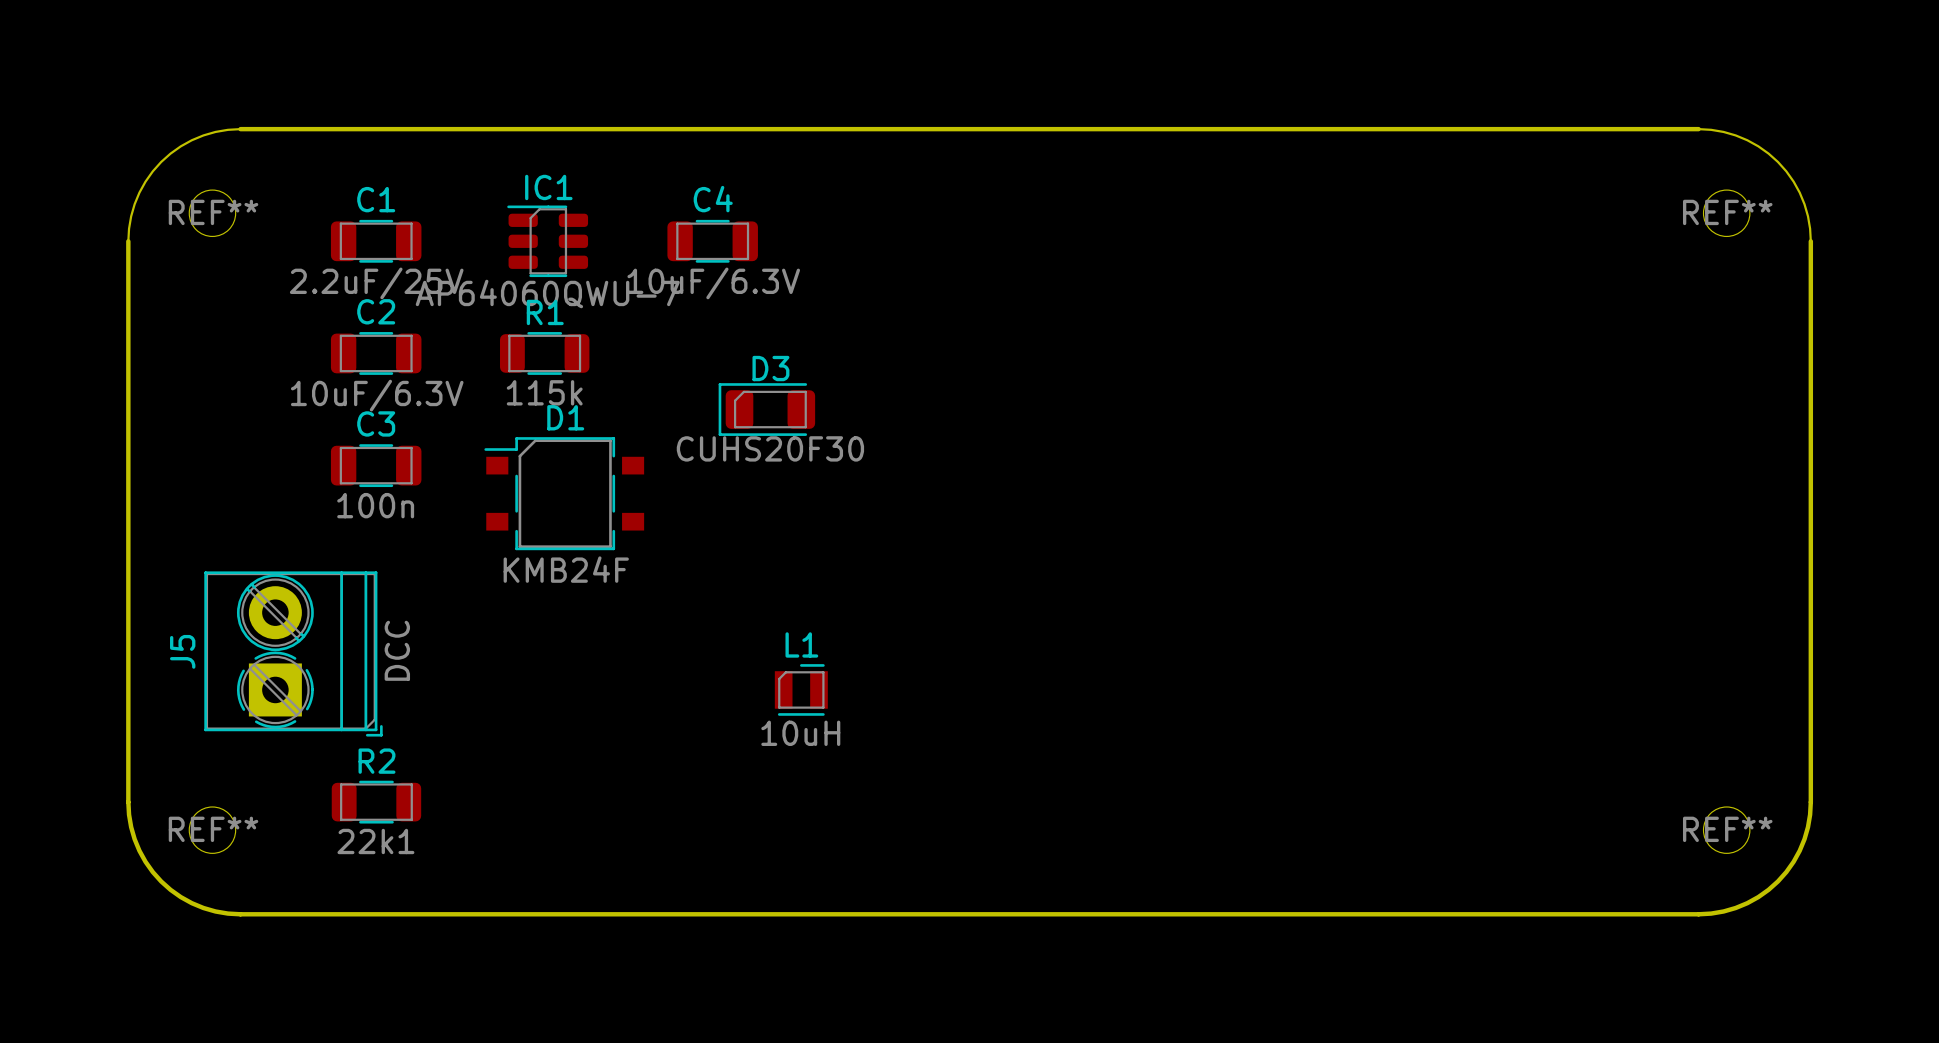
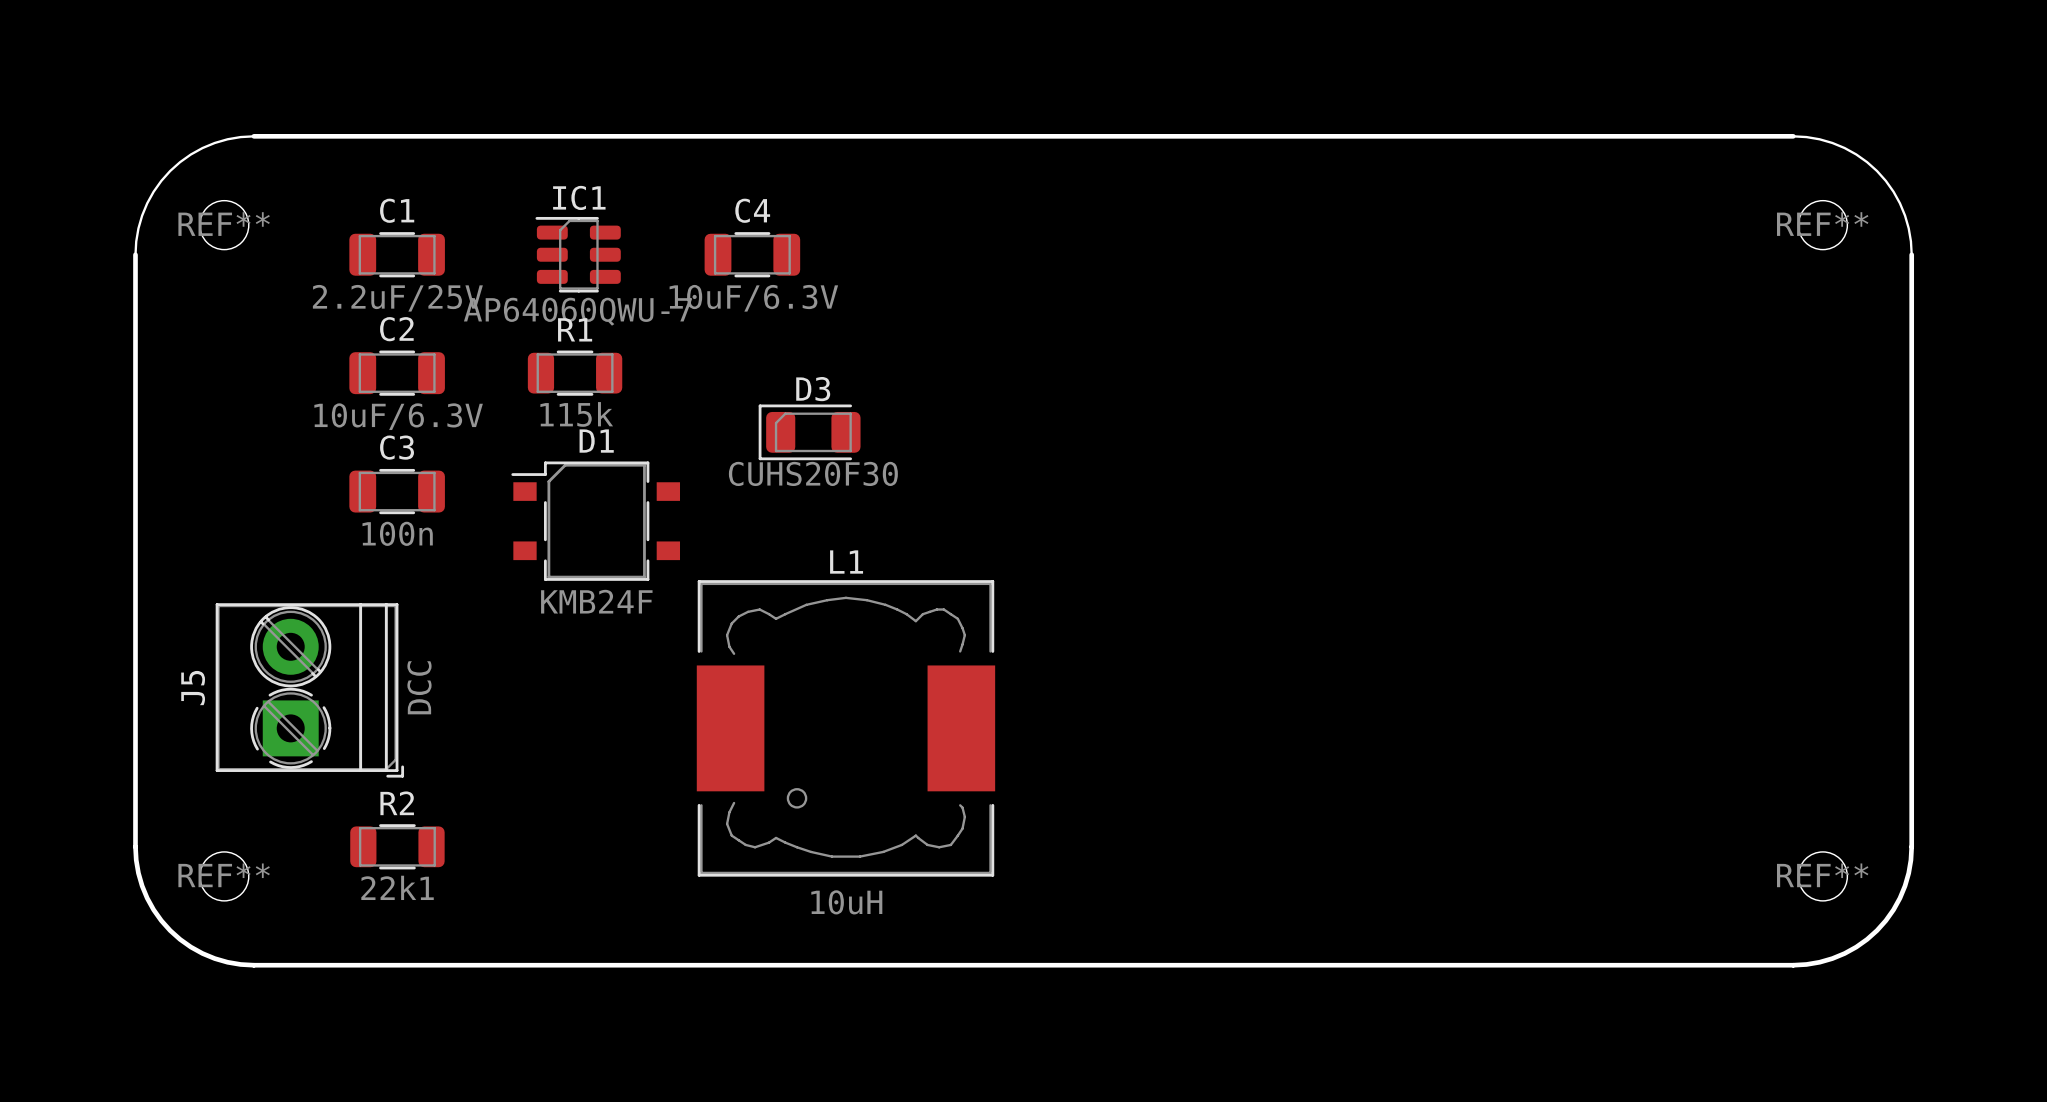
L1 name position: L1 (801, 644) -> L1 (846, 562)
L1 footprint: [774, 664, 828, 716] -> [696, 580, 996, 877]
L1 value position: 10uH (800, 733) -> 10uH (846, 902)

